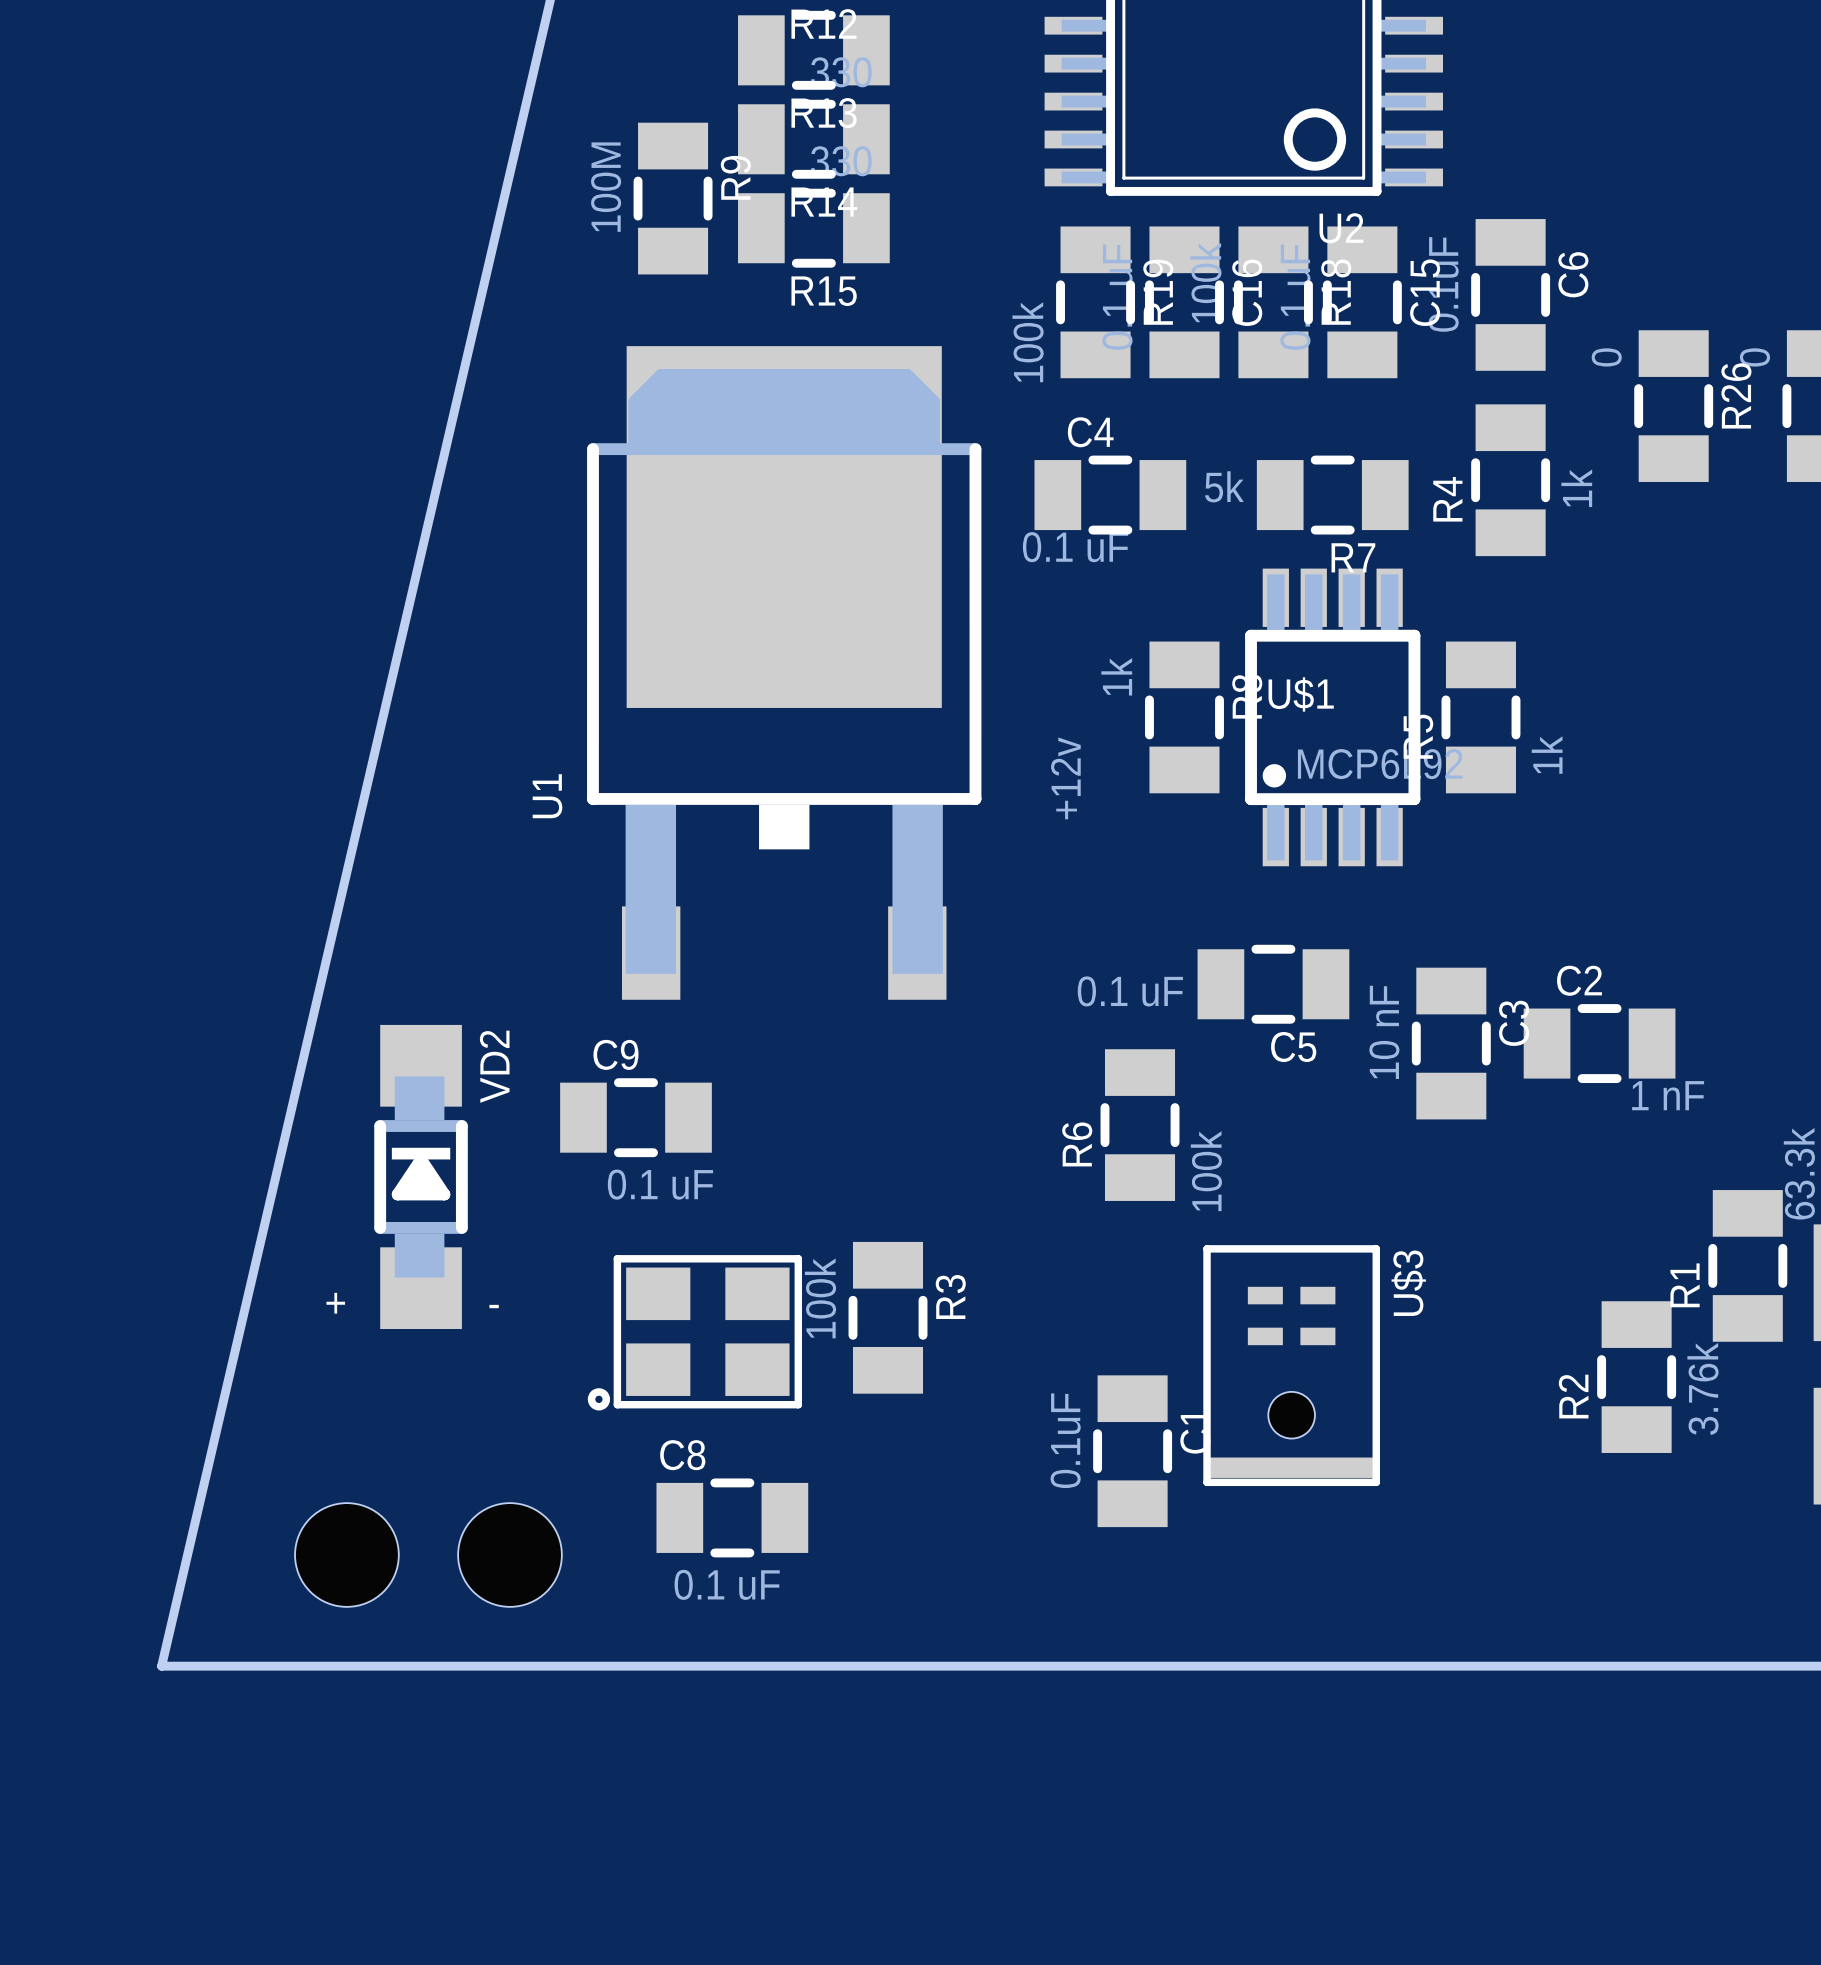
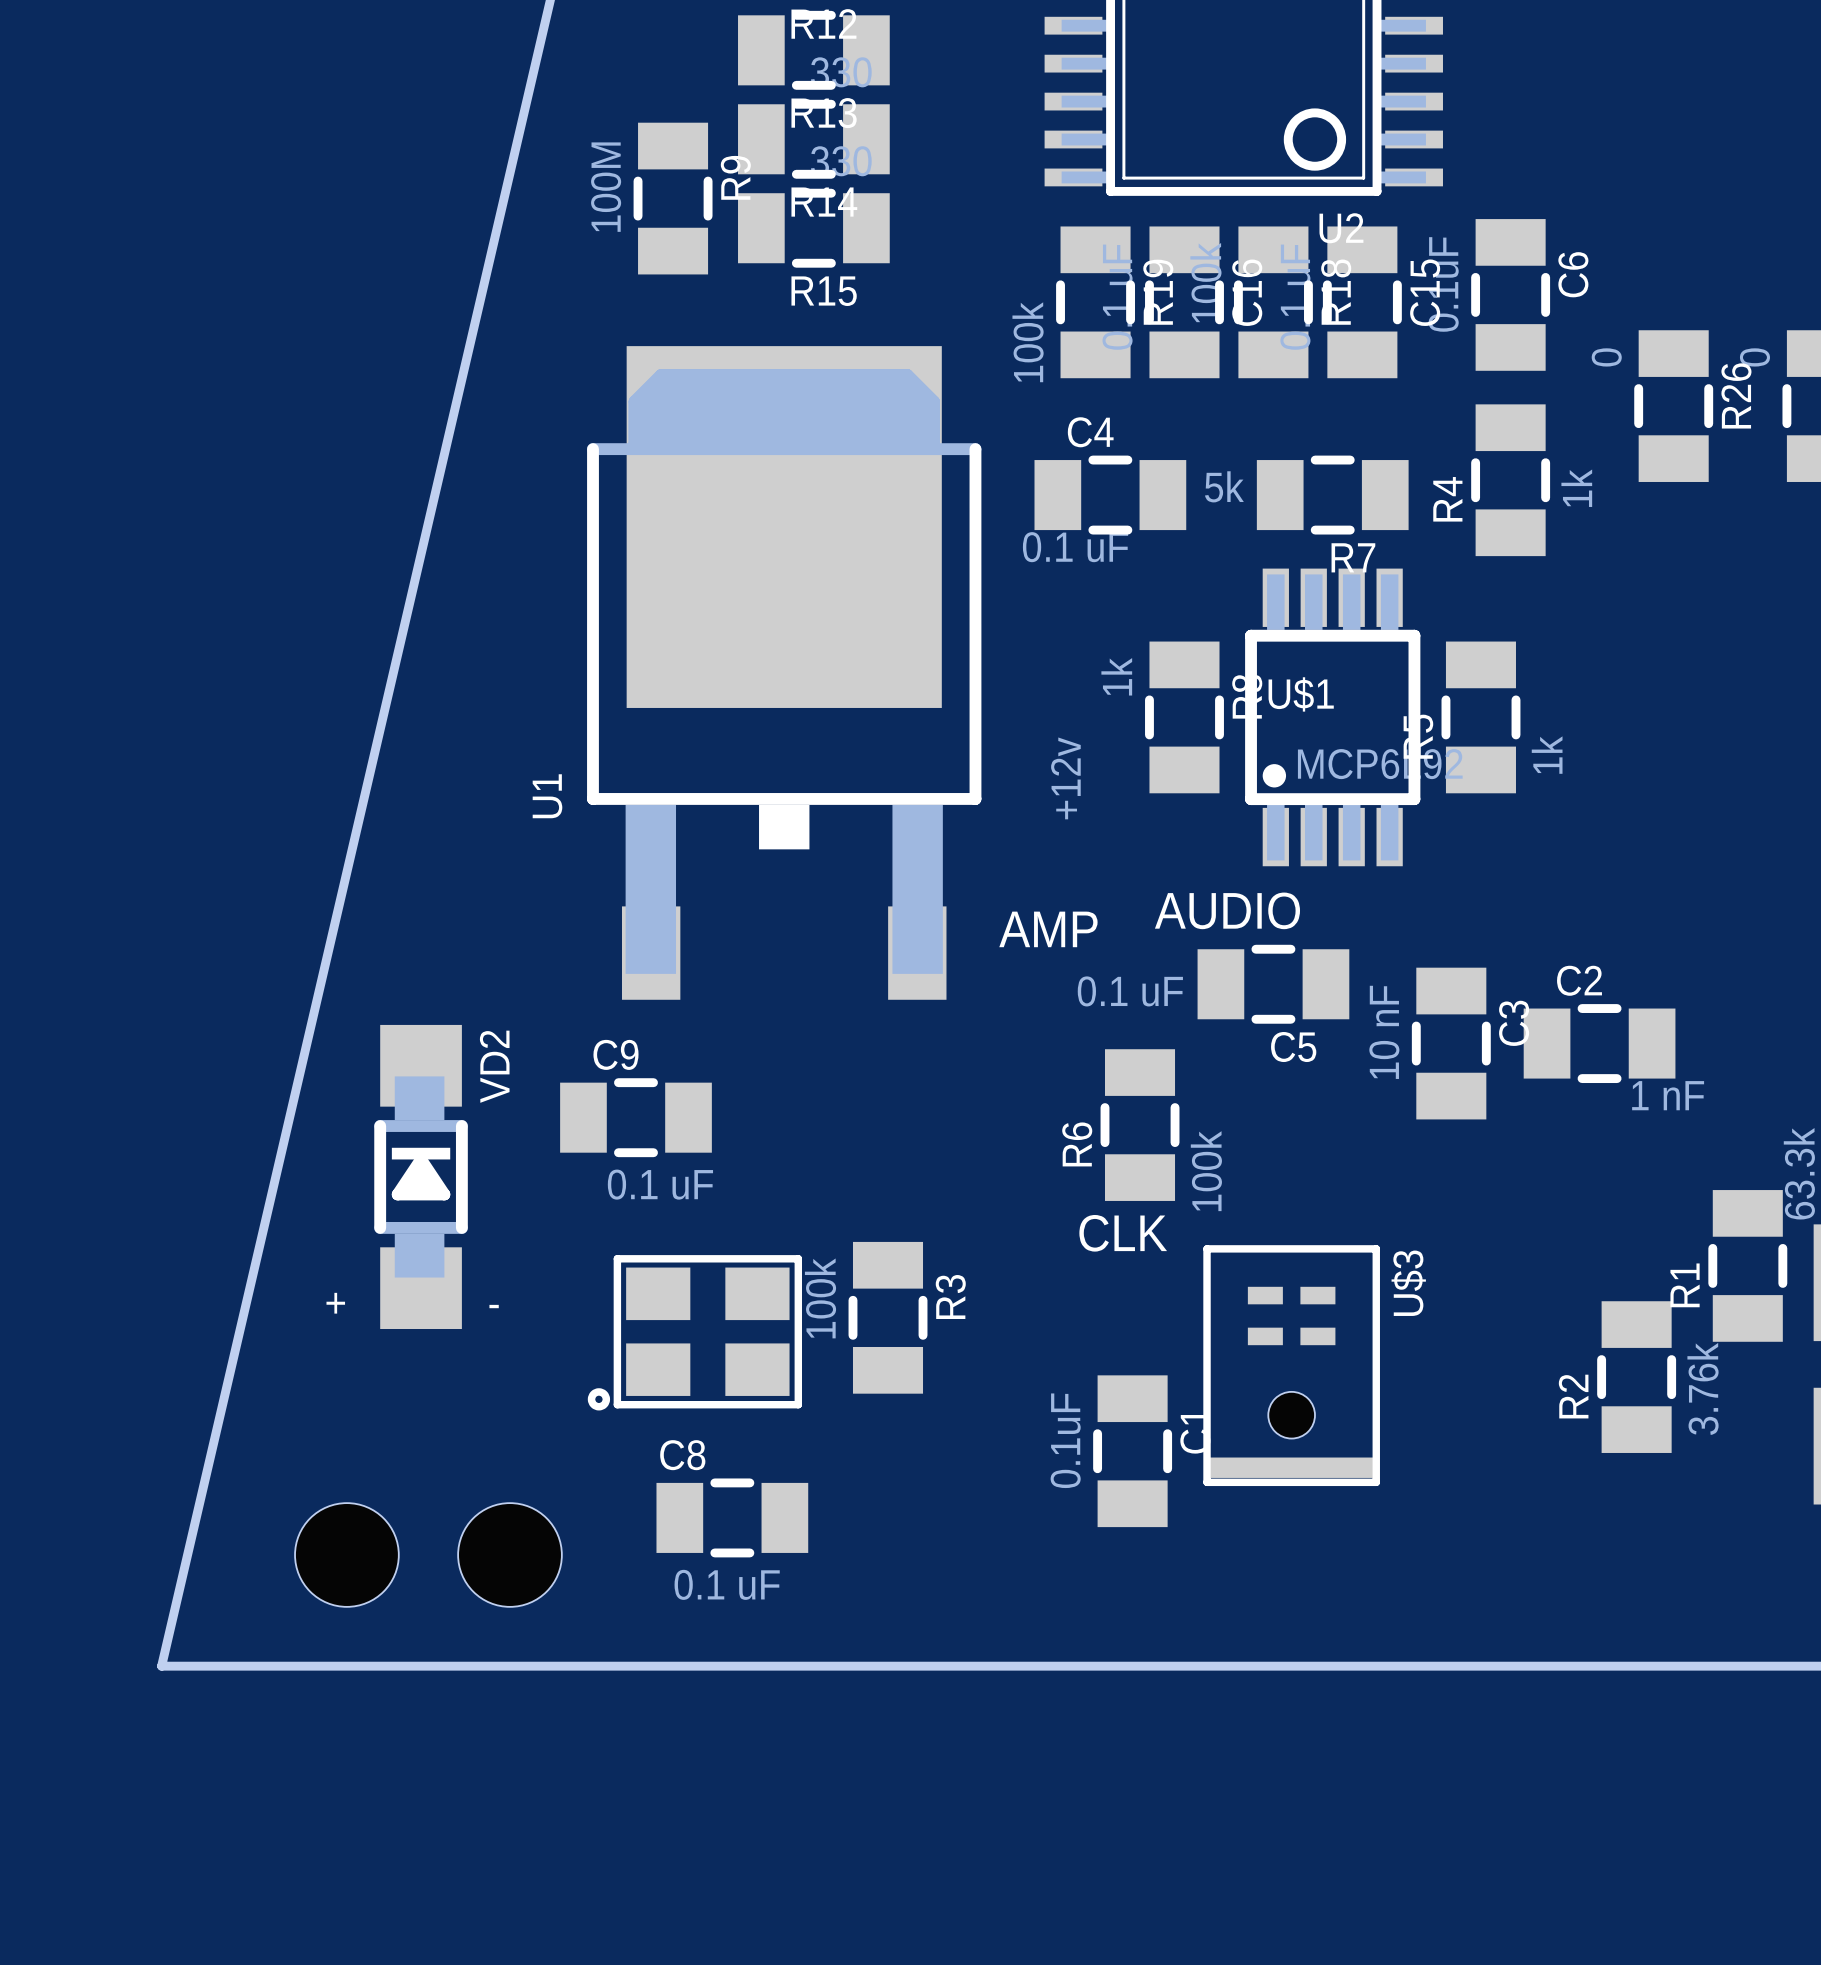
text: none -> AUDIO (1227, 910)
text: none -> AMP (1048, 929)
text: none -> CLK (1123, 1233)

